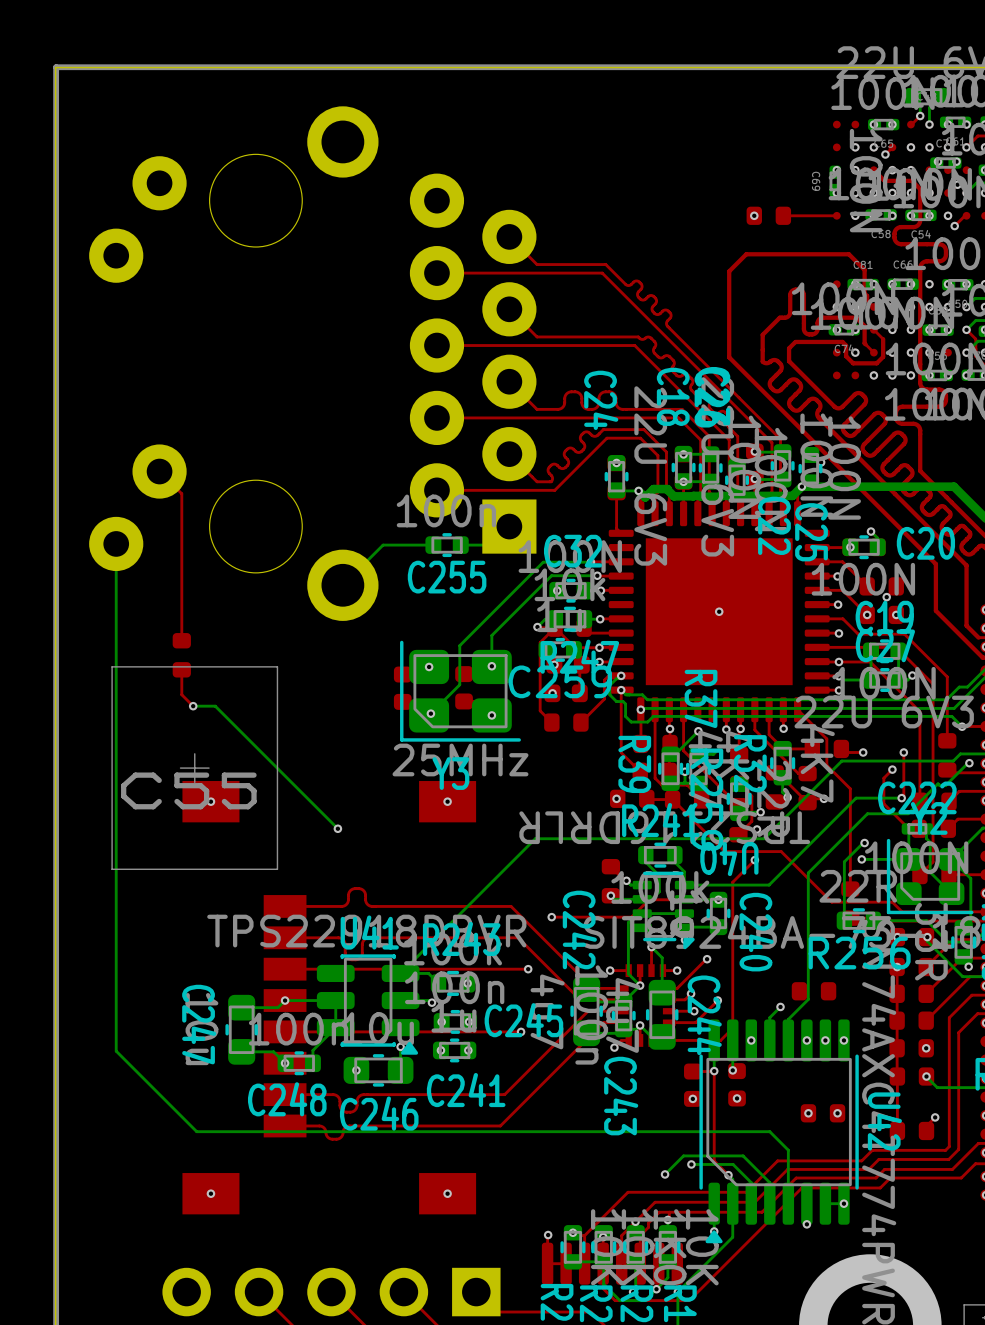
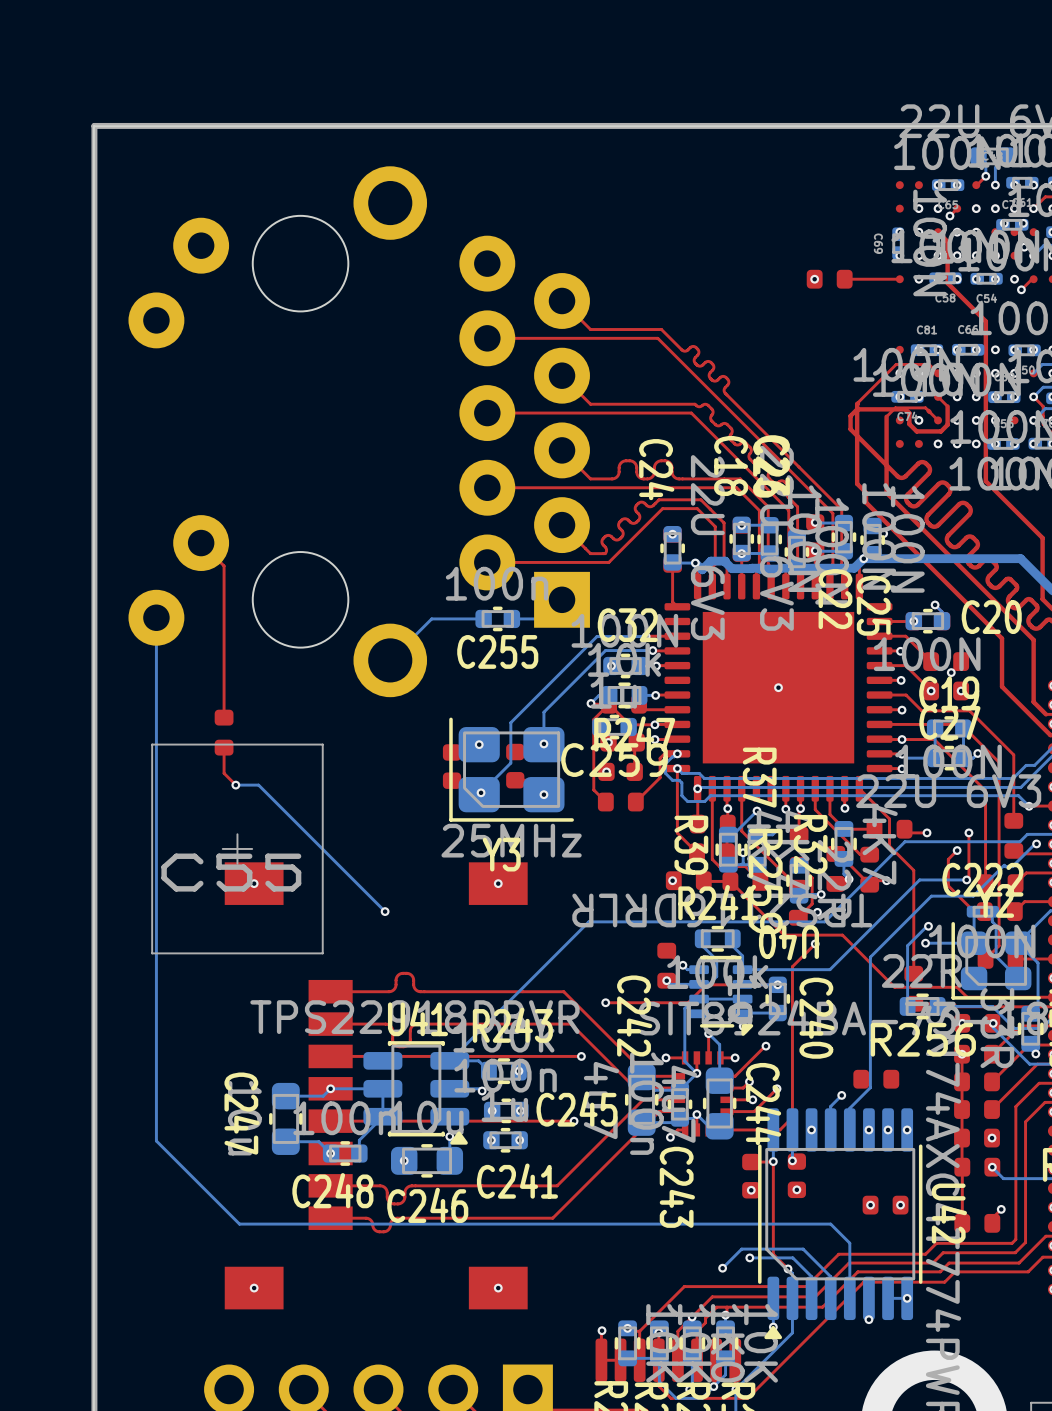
top track: (883, 179) (911, 180) (920, 189) (919, 223) (914, 226) (897, 228) (894, 233) (896, 242) (901, 244) (939, 244) (945, 248) (945, 255) (943, 259) (924, 261) (920, 268) -> (947, 282) (947, 241) (947, 283) (985, 321) (985, 333)
top track: (867, 300) (864, 293) (864, 269) (848, 254) (746, 254) (729, 271) (729, 357) (804, 432) -> (931, 366) (929, 364) (896, 364) (857, 404) (857, 483) (865, 492) (865, 502)
via: (966, 307) -> none
top track: (864, 343) (864, 325) (856, 317) (821, 318) (817, 321) (815, 332) (805, 333) (803, 328) (803, 293) (800, 290) (794, 289) (790, 293) (789, 315) (779, 317) (762, 334) (762, 361) (766, 363) (770, 361) -> none
top track: (770, 361) (776, 360) (781, 367) (770, 381) (770, 387) (778, 391) (790, 380) (796, 380) (800, 388) (789, 400) (789, 406) (797, 410) (810, 399) (815, 399) (820, 405) (817, 415) (823, 422) -> (929, 411) (925, 407) (895, 407) (886, 416) (886, 492)
top track: (920, 382) (924, 389) (943, 391) (945, 395) (944, 403) (939, 406) (900, 407) (896, 411) (896, 419) (900, 423) (914, 423) (918, 426) (920, 470) (975, 525) -> (985, 451) (985, 481) (1042, 538) (1042, 599)

